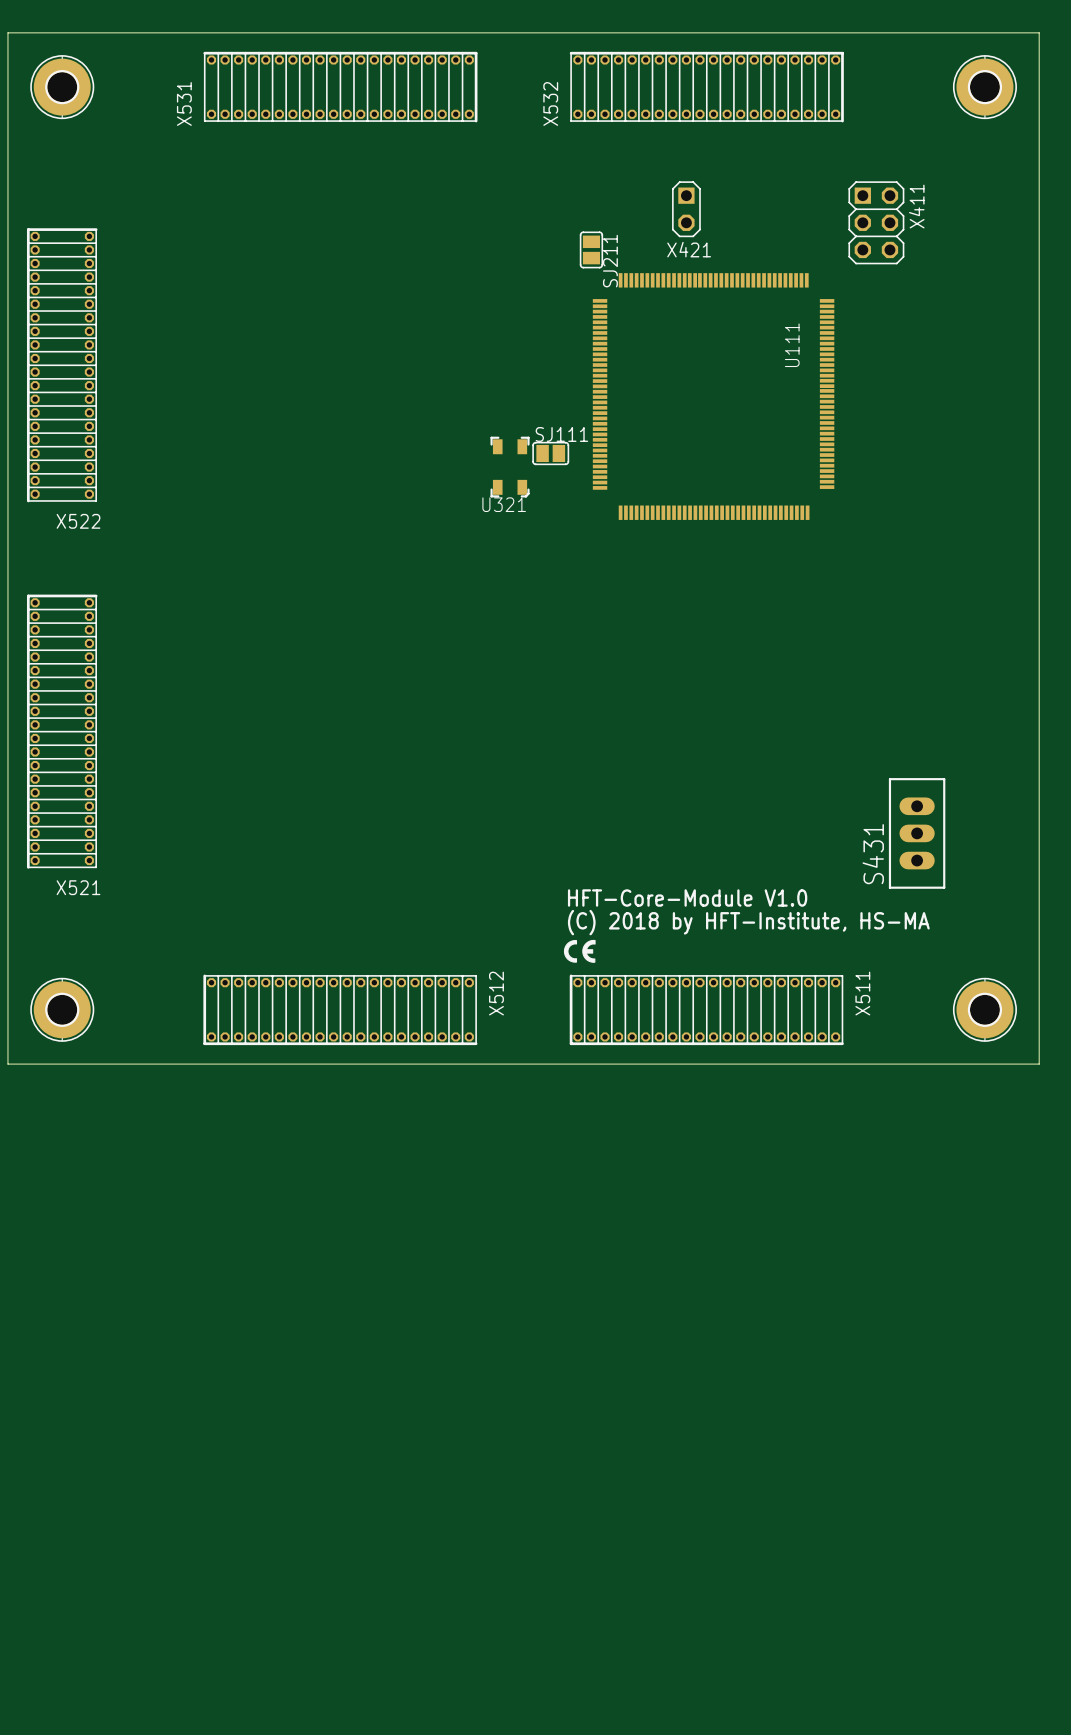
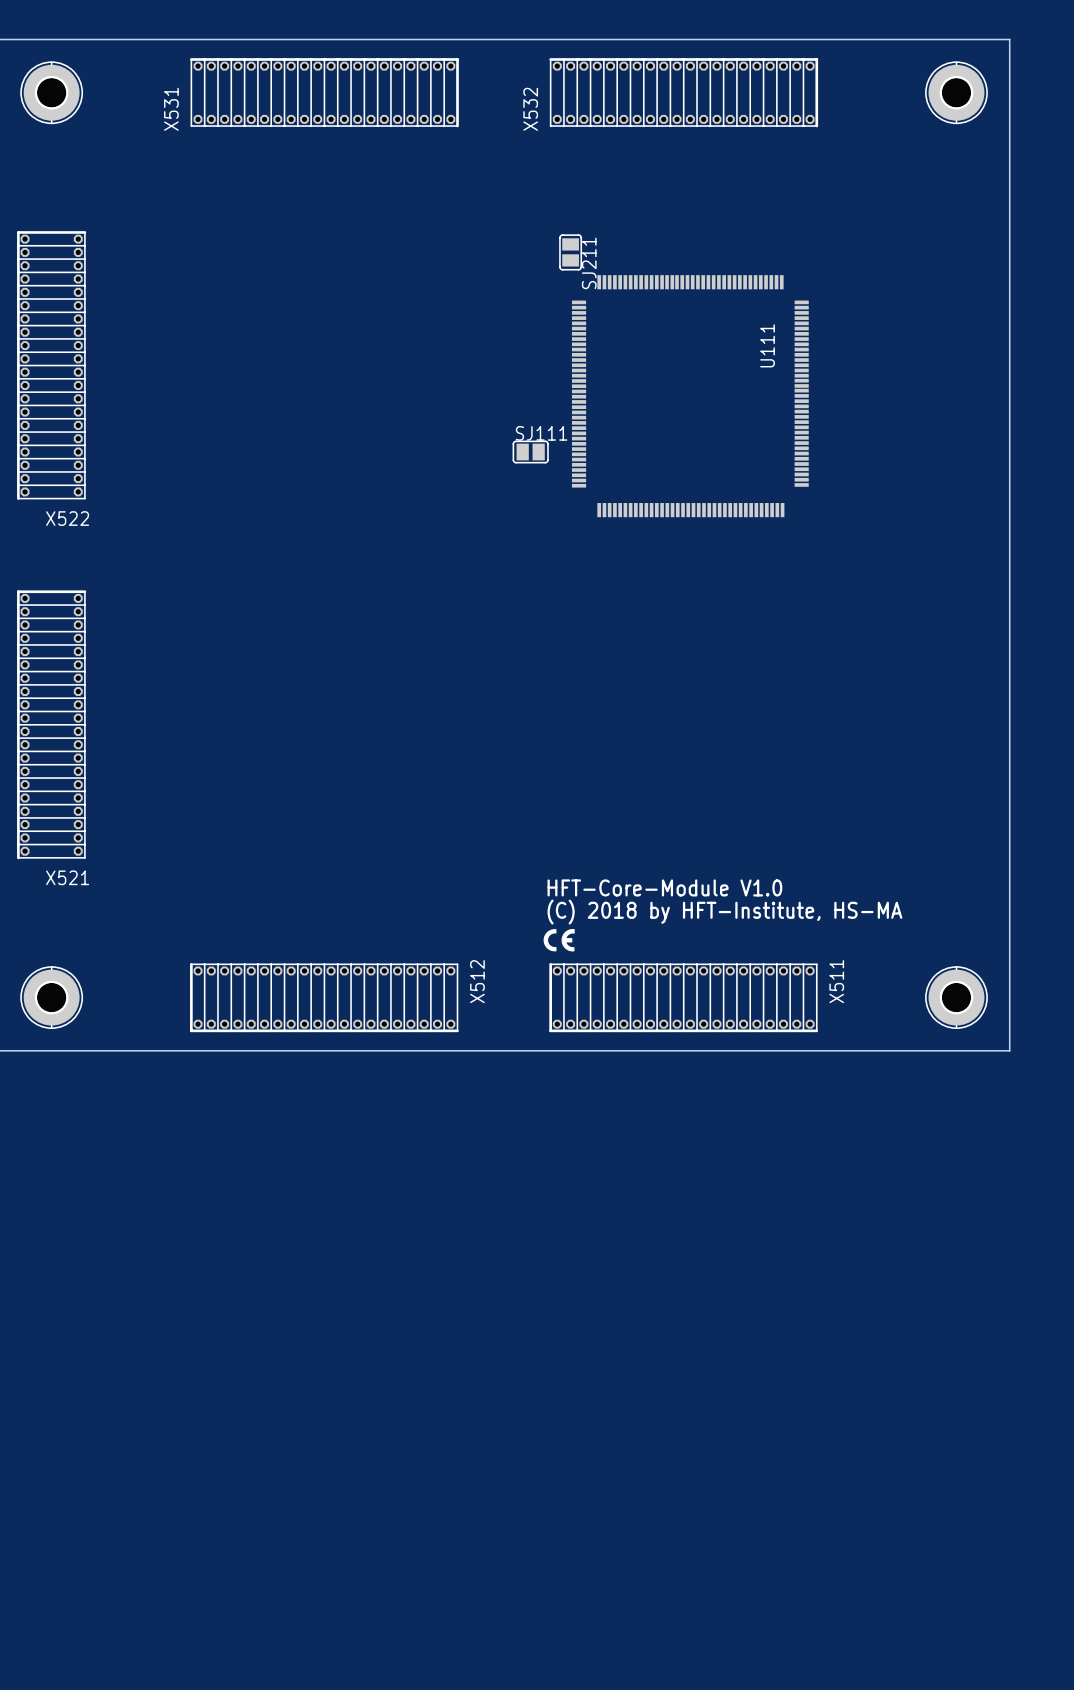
X421: (686, 209) -> none
X411: (876, 222) -> none
U321: (510, 467) -> none
S431: (917, 833) -> none

